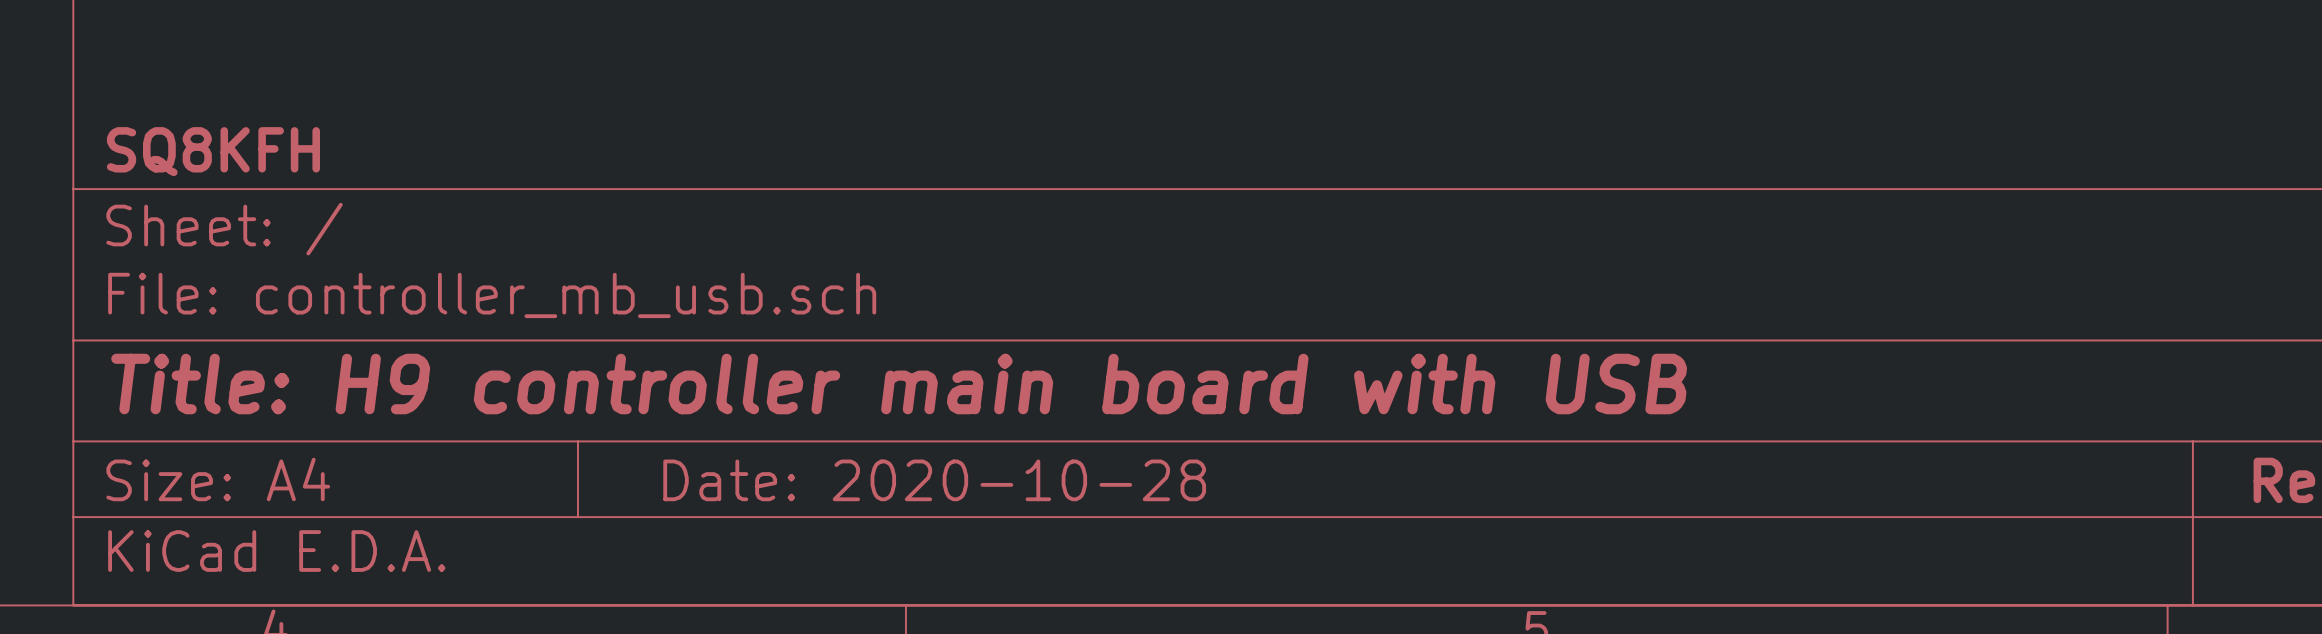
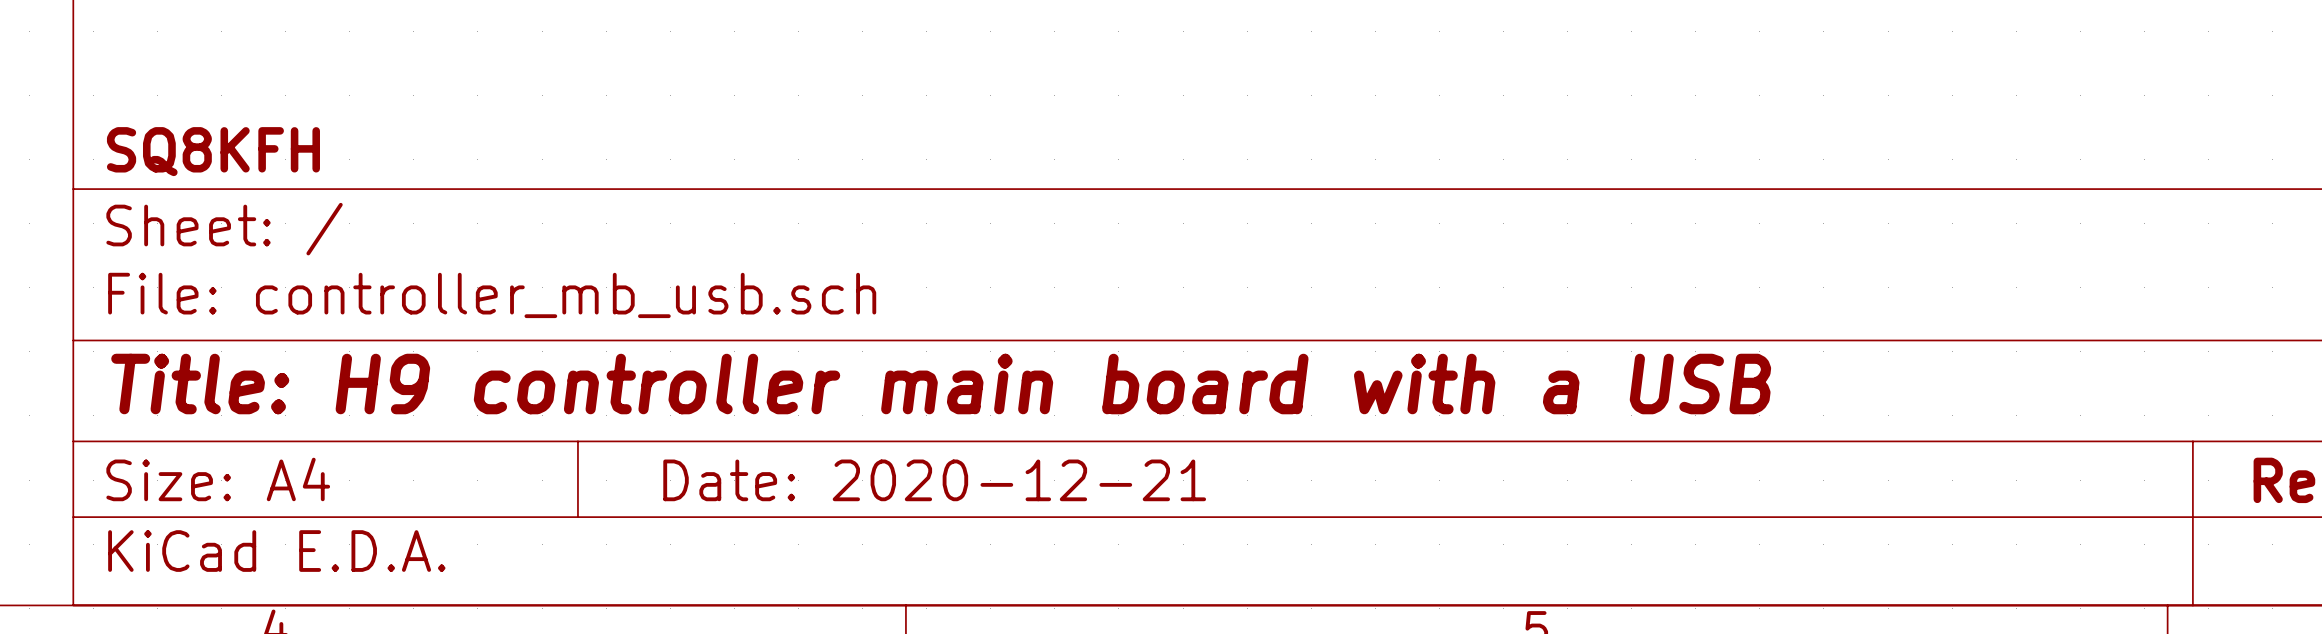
title block: Title: H9 controller main board with USB (899, 384) -> Title: H9 controller main board with a USB (941, 384)
title block: Date: 2020-10-28 (934, 480) -> Date: 2020-12-21 (934, 480)

